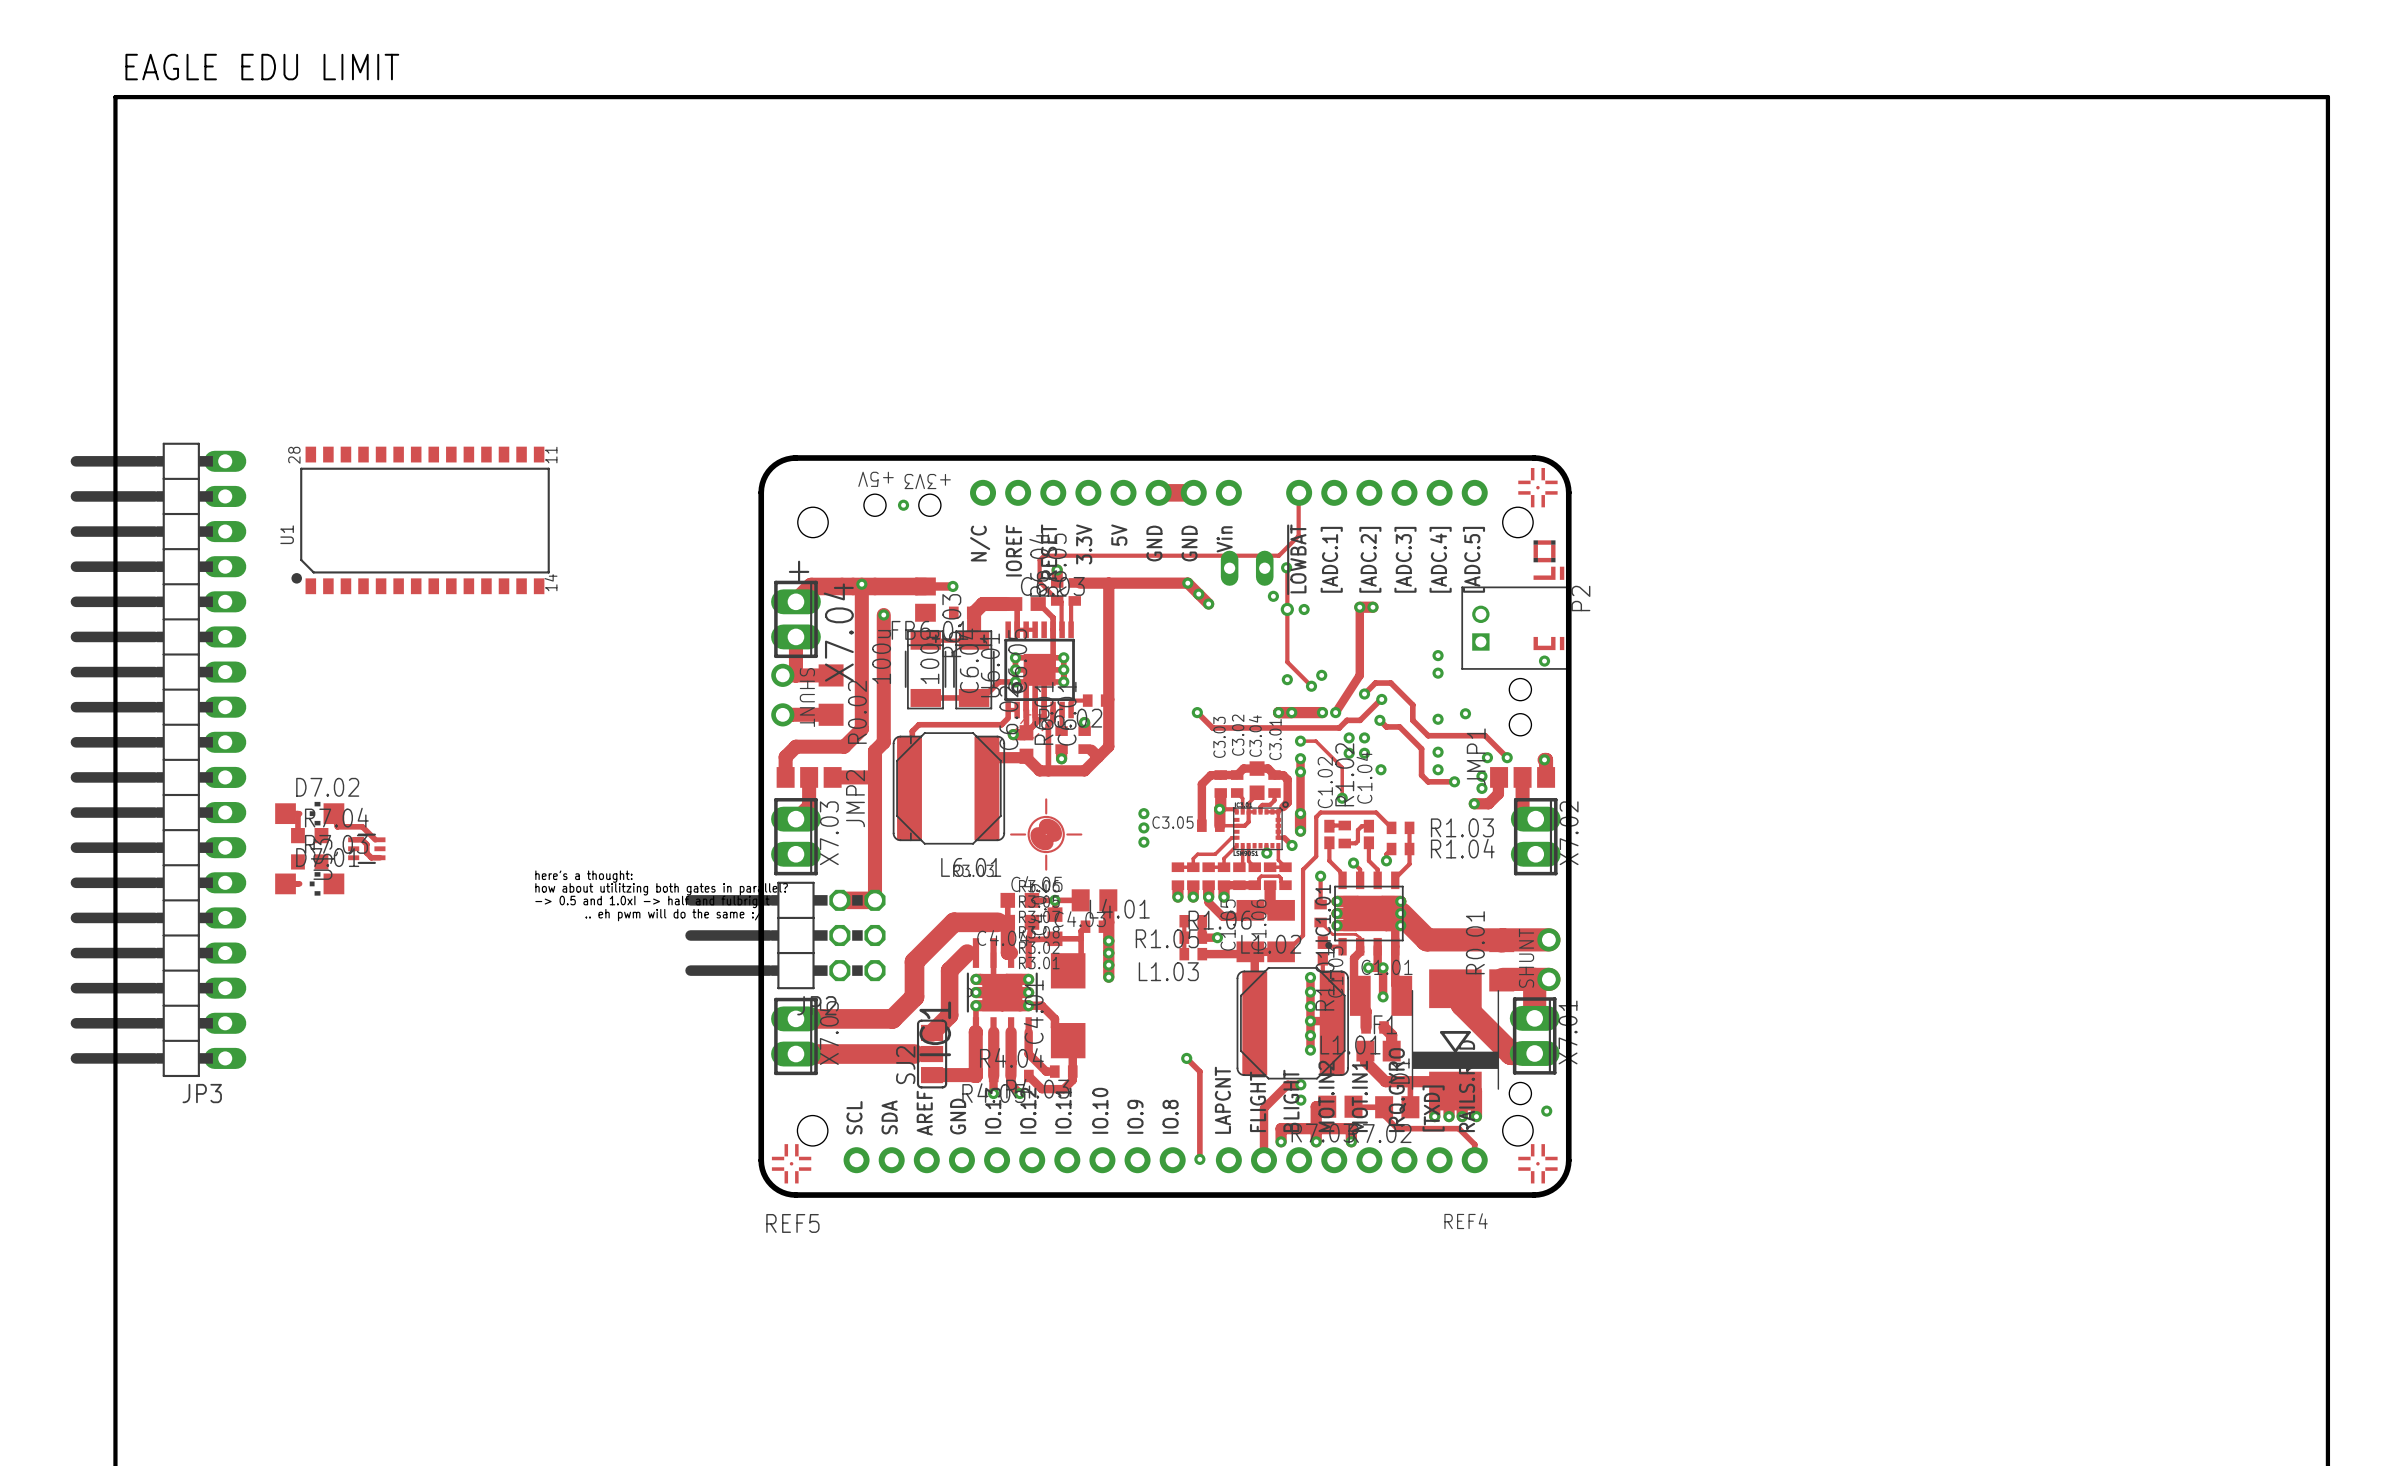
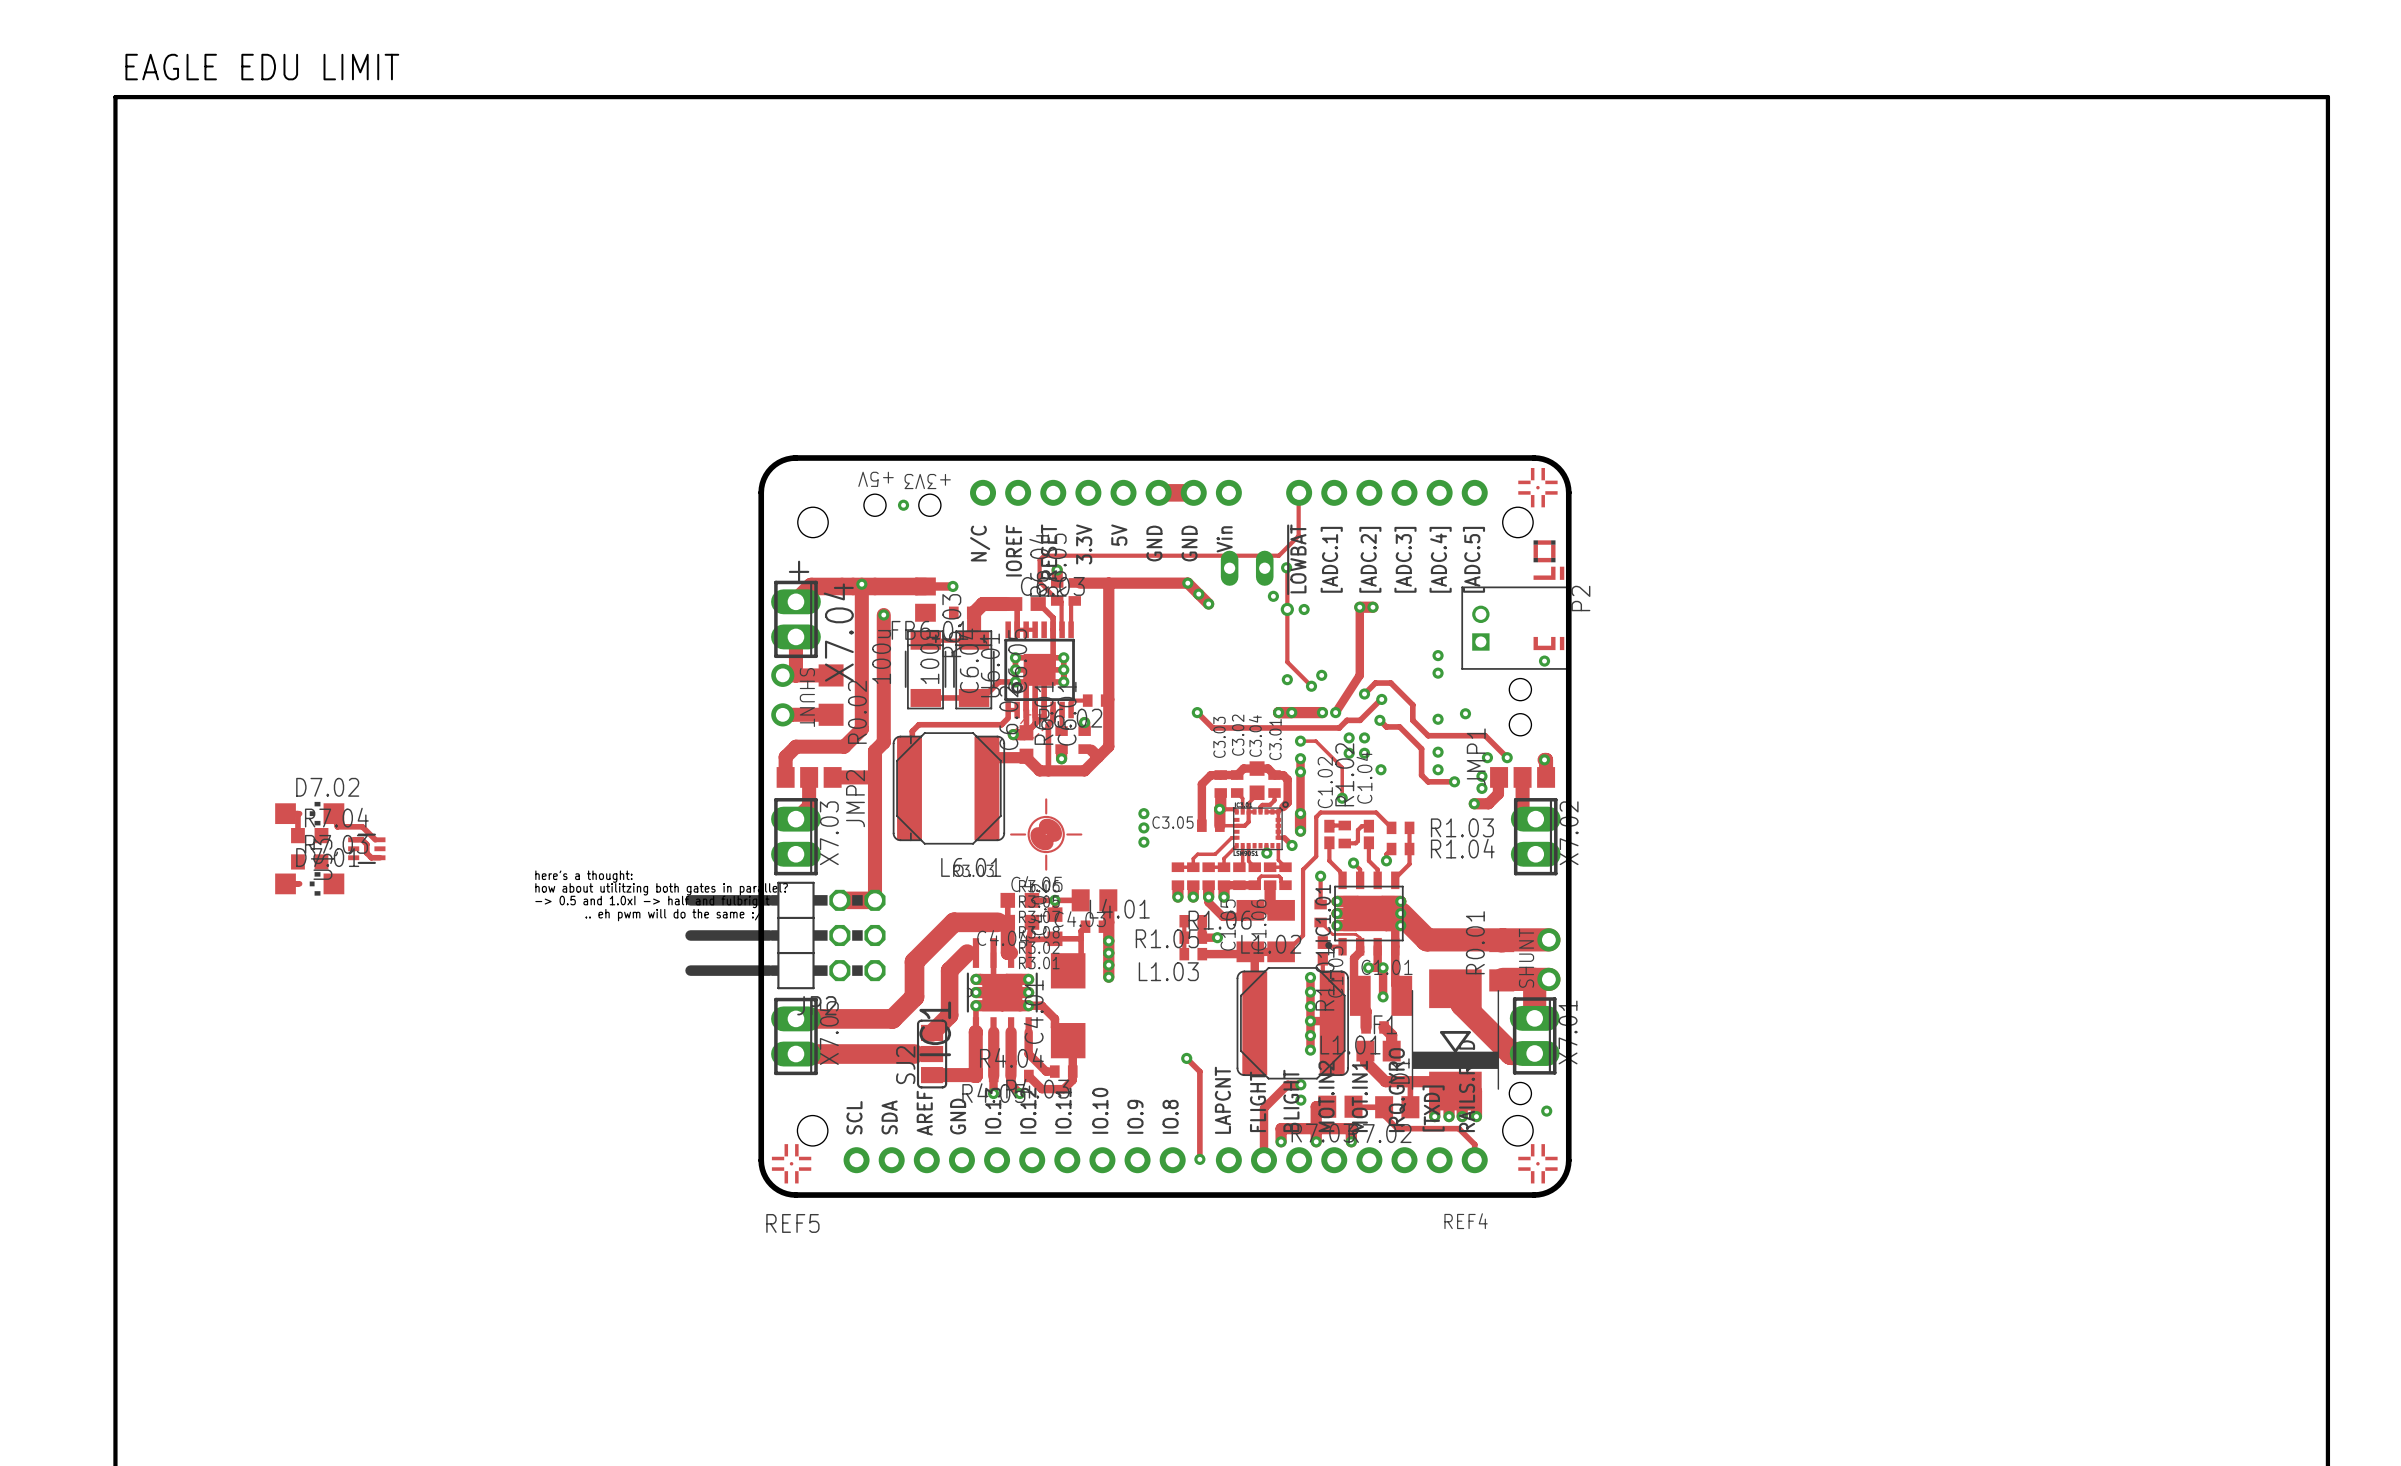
U1: (420, 520) -> none
JP3: (158, 759) -> none

